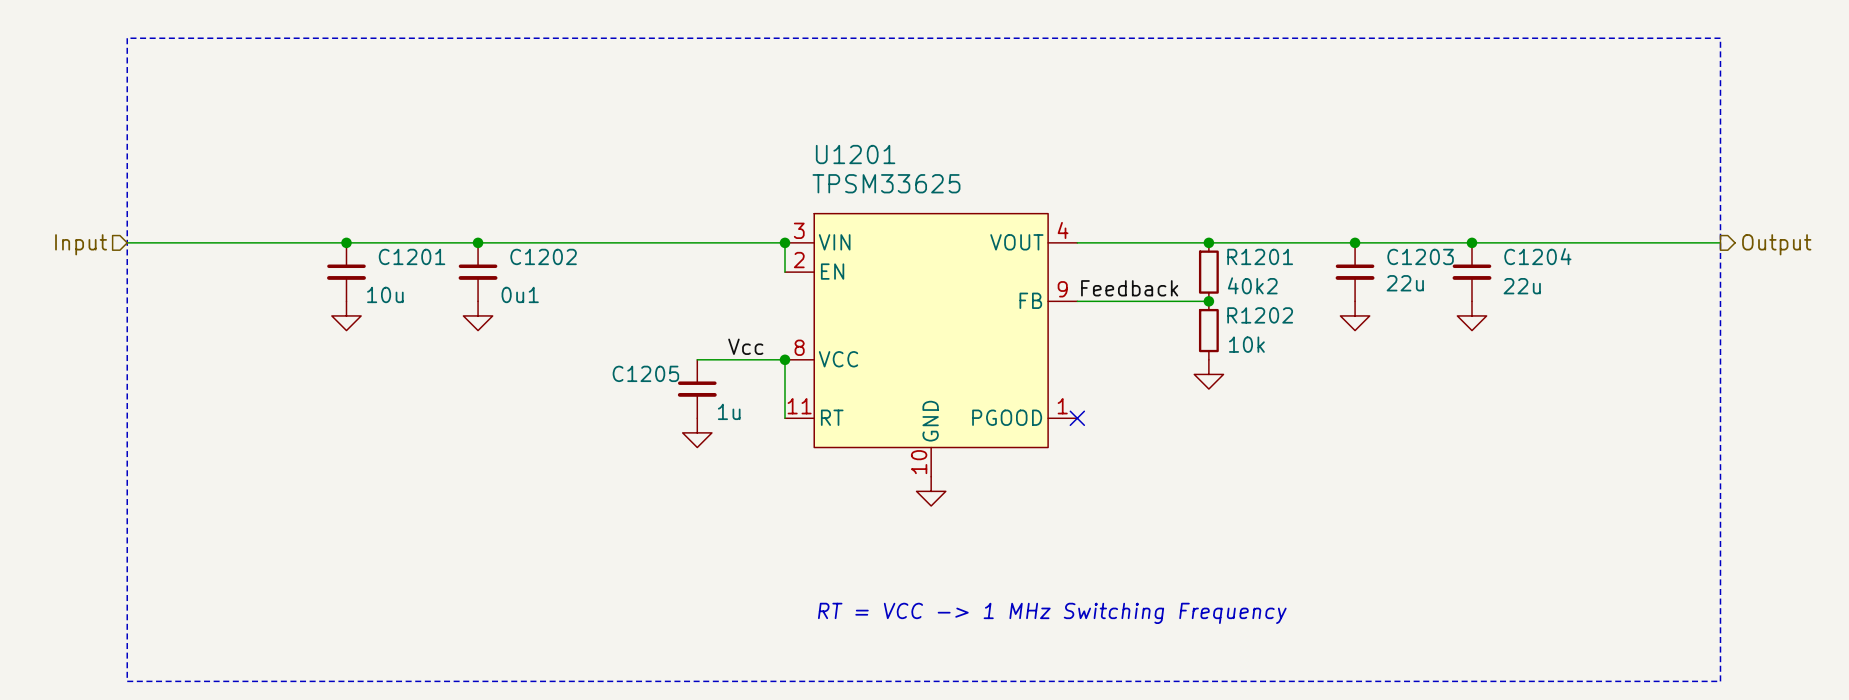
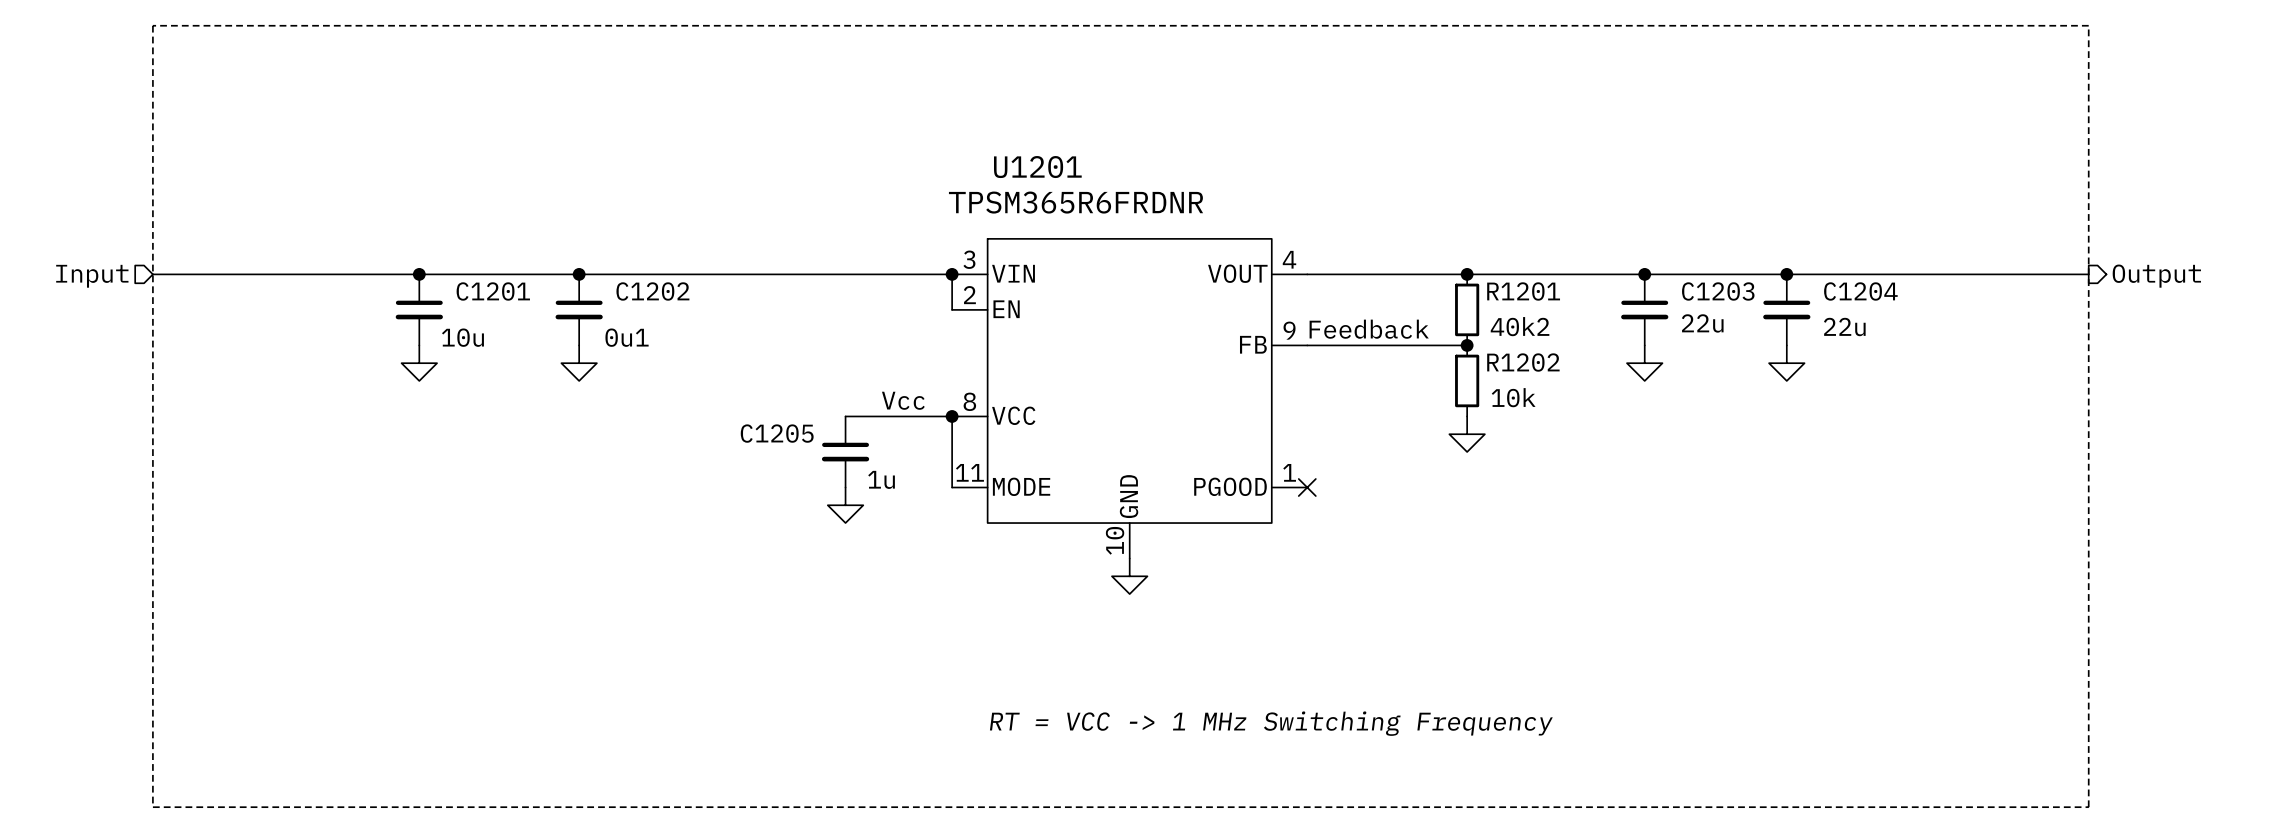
U1201 value: TPSM33625 (886, 183) -> TPSM365R6FRDNR (1076, 202)
U1201 pin name: RT (832, 417) -> MODE (1021, 486)

